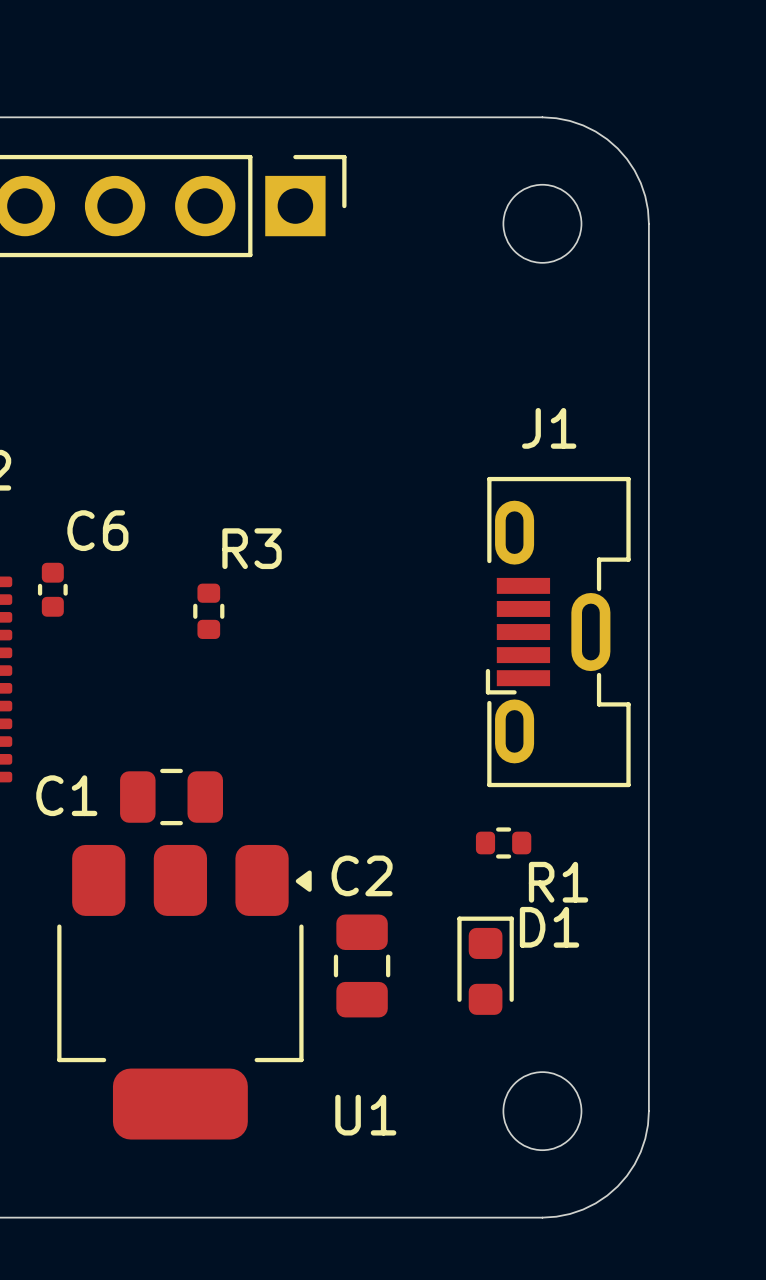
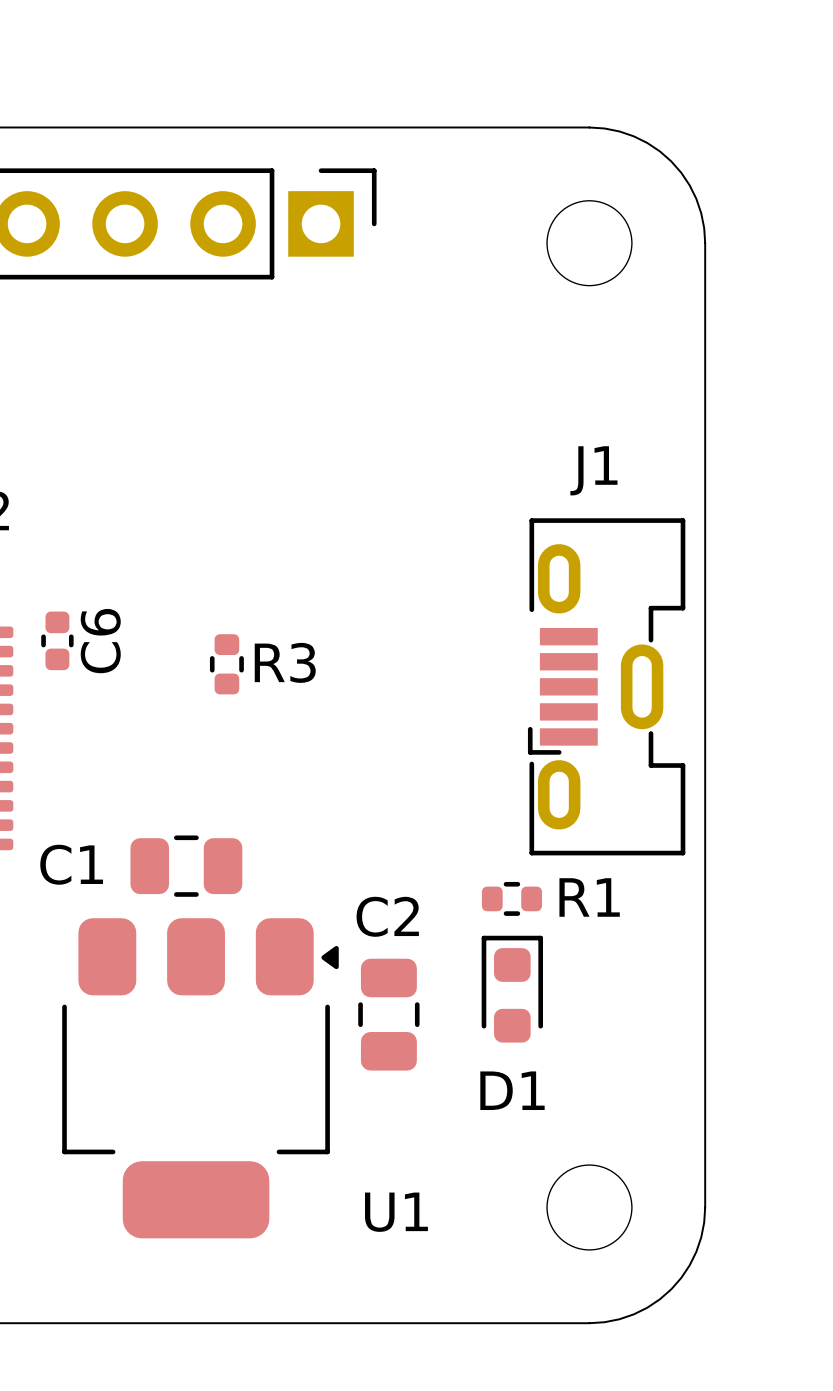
C6 name rotation: 0° (97, 530) -> 90° counterclockwise (100, 641)
R3 name position: R3 (252, 548) -> R3 (285, 662)
R1 position: (503, 842) -> (511, 898)
R1 name position: R1 (558, 882) -> R1 (589, 897)
D1 name position: D1 (549, 927) -> D1 (512, 1090)
C2 position: (362, 965) -> (388, 1014)
D1 position: (485, 965) -> (512, 989)

